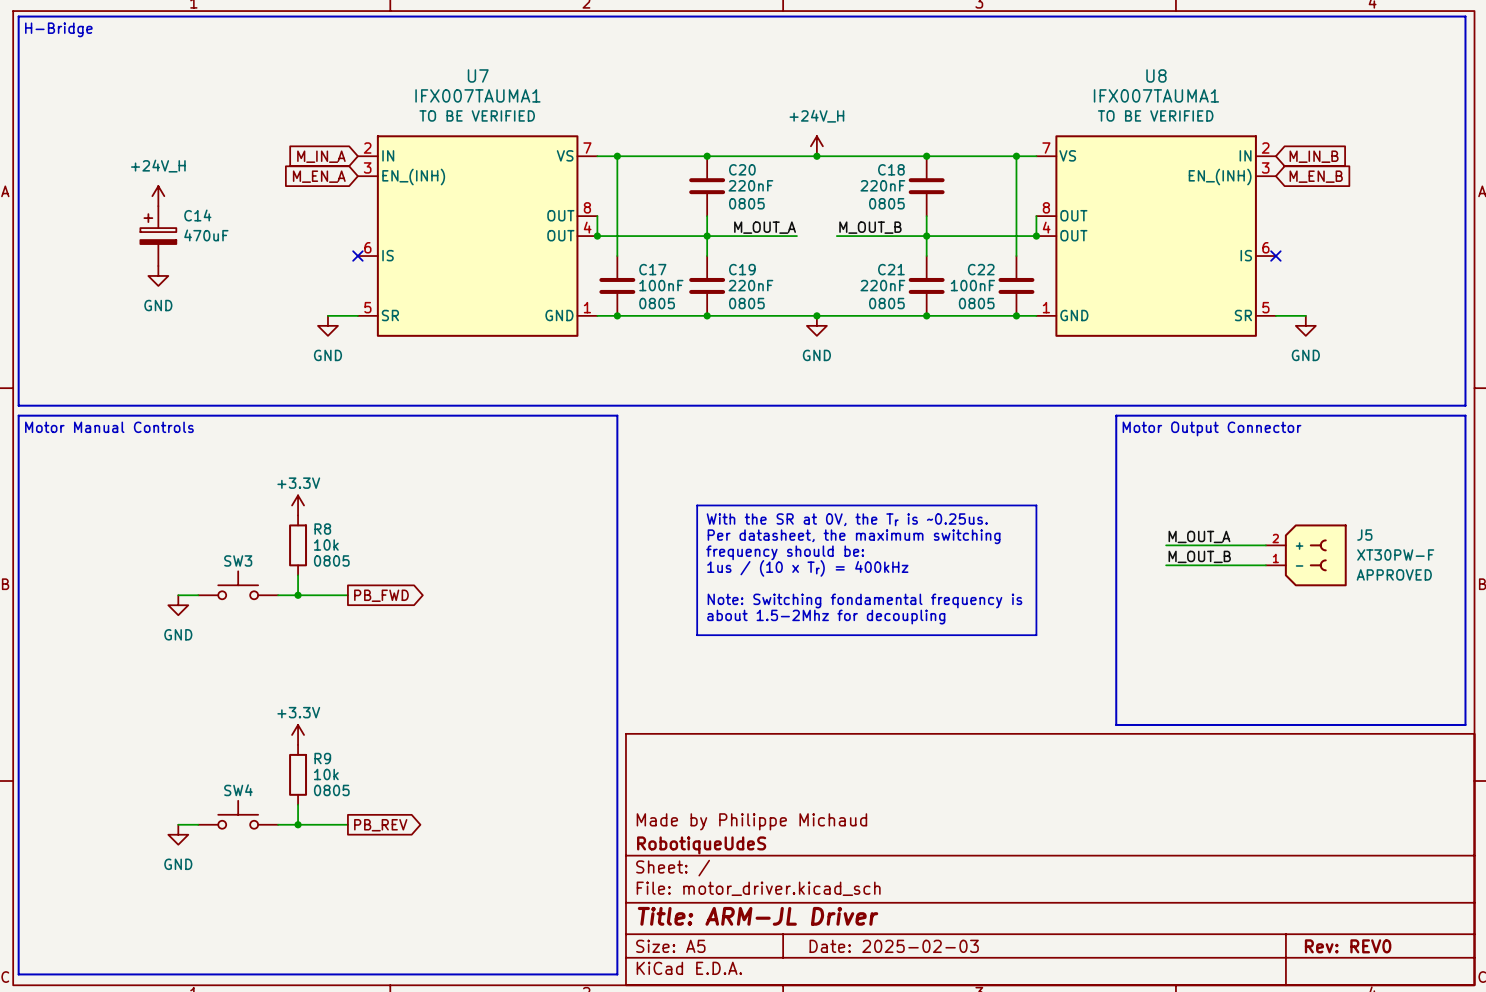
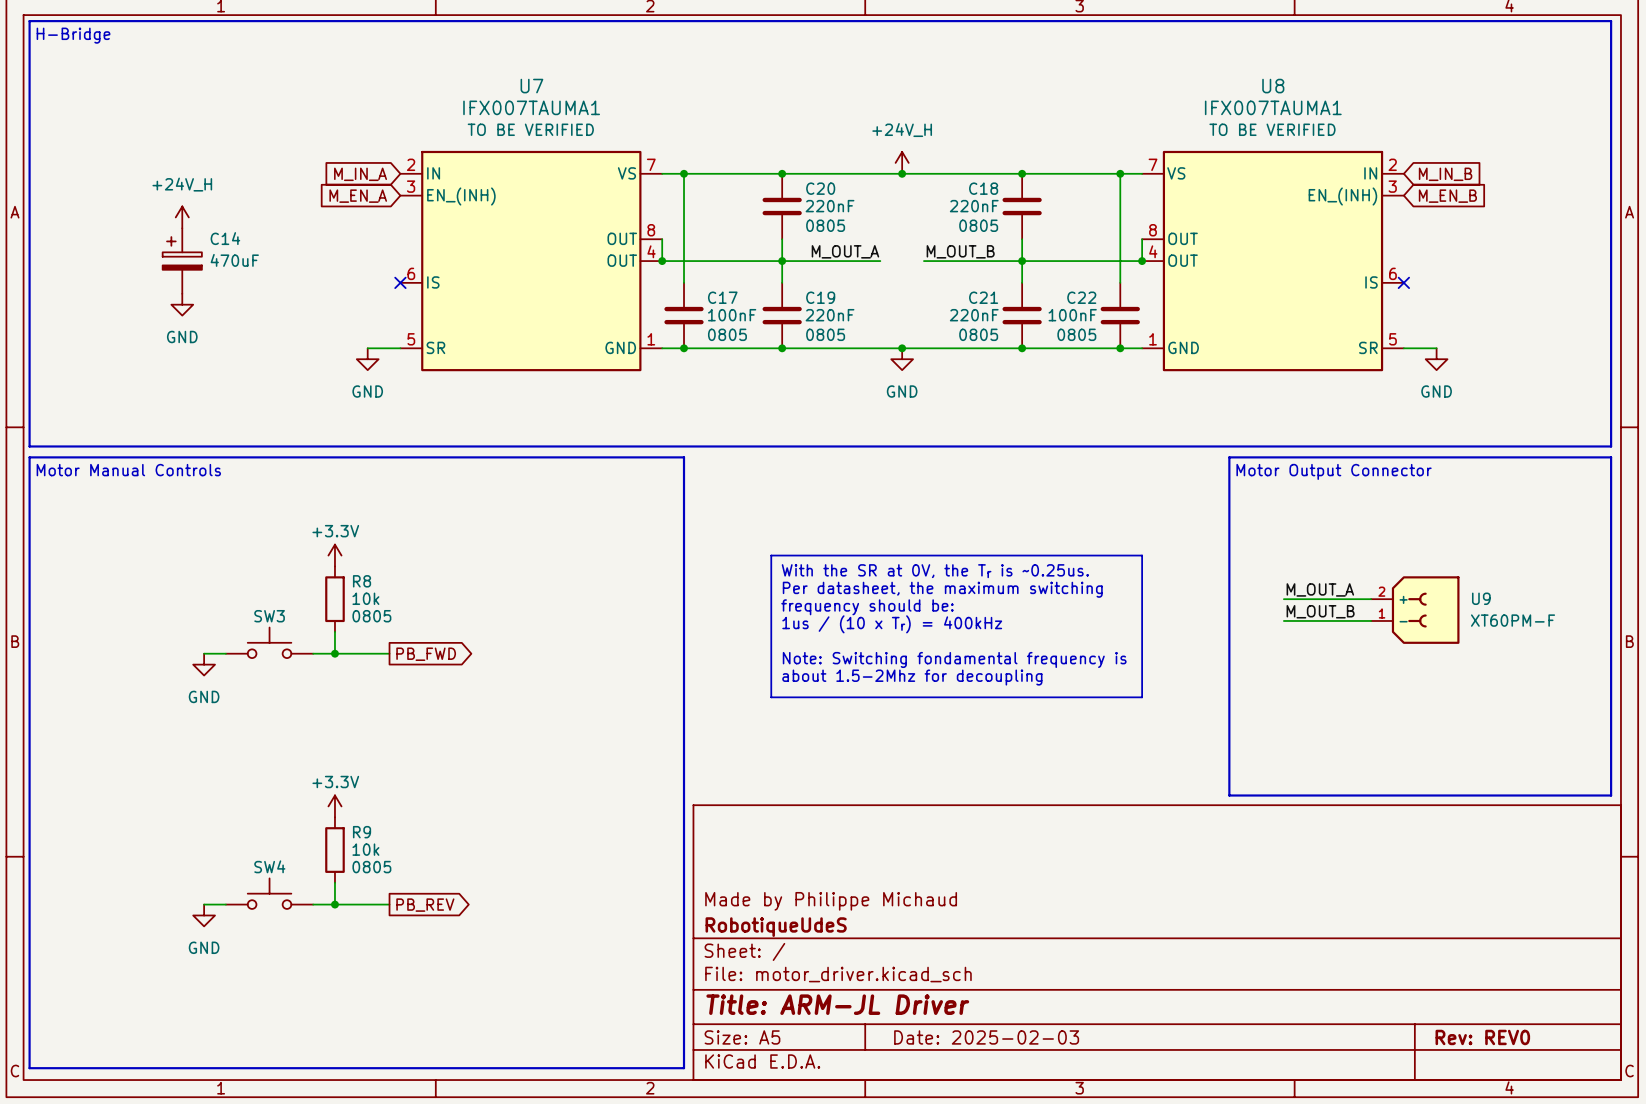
U9: none -> XT60PM-F (1415, 610)
J5: XT30PW-F (1306, 555) -> none

